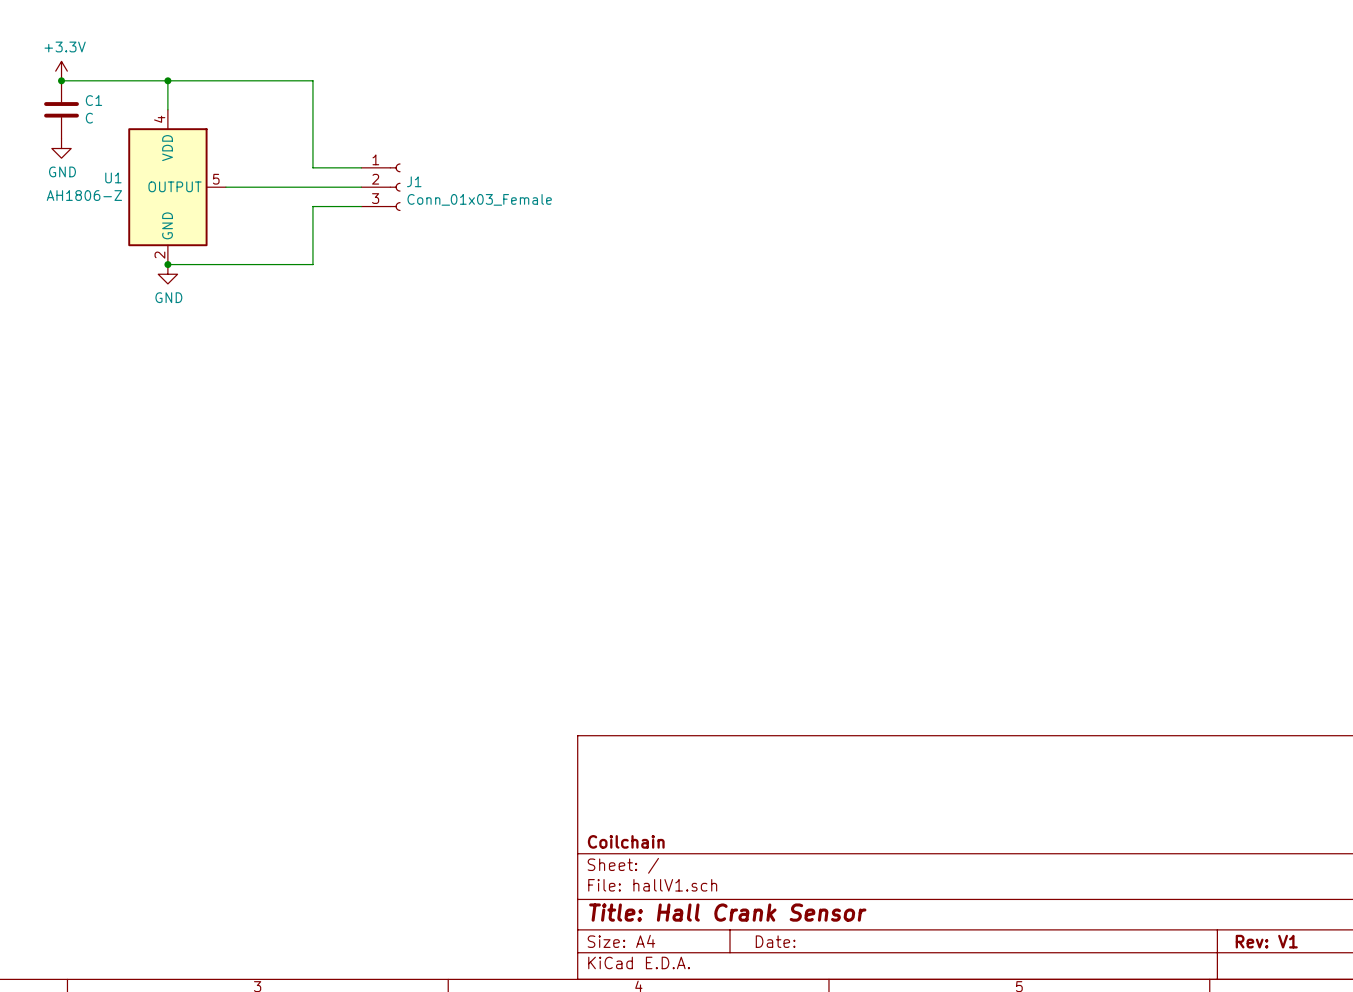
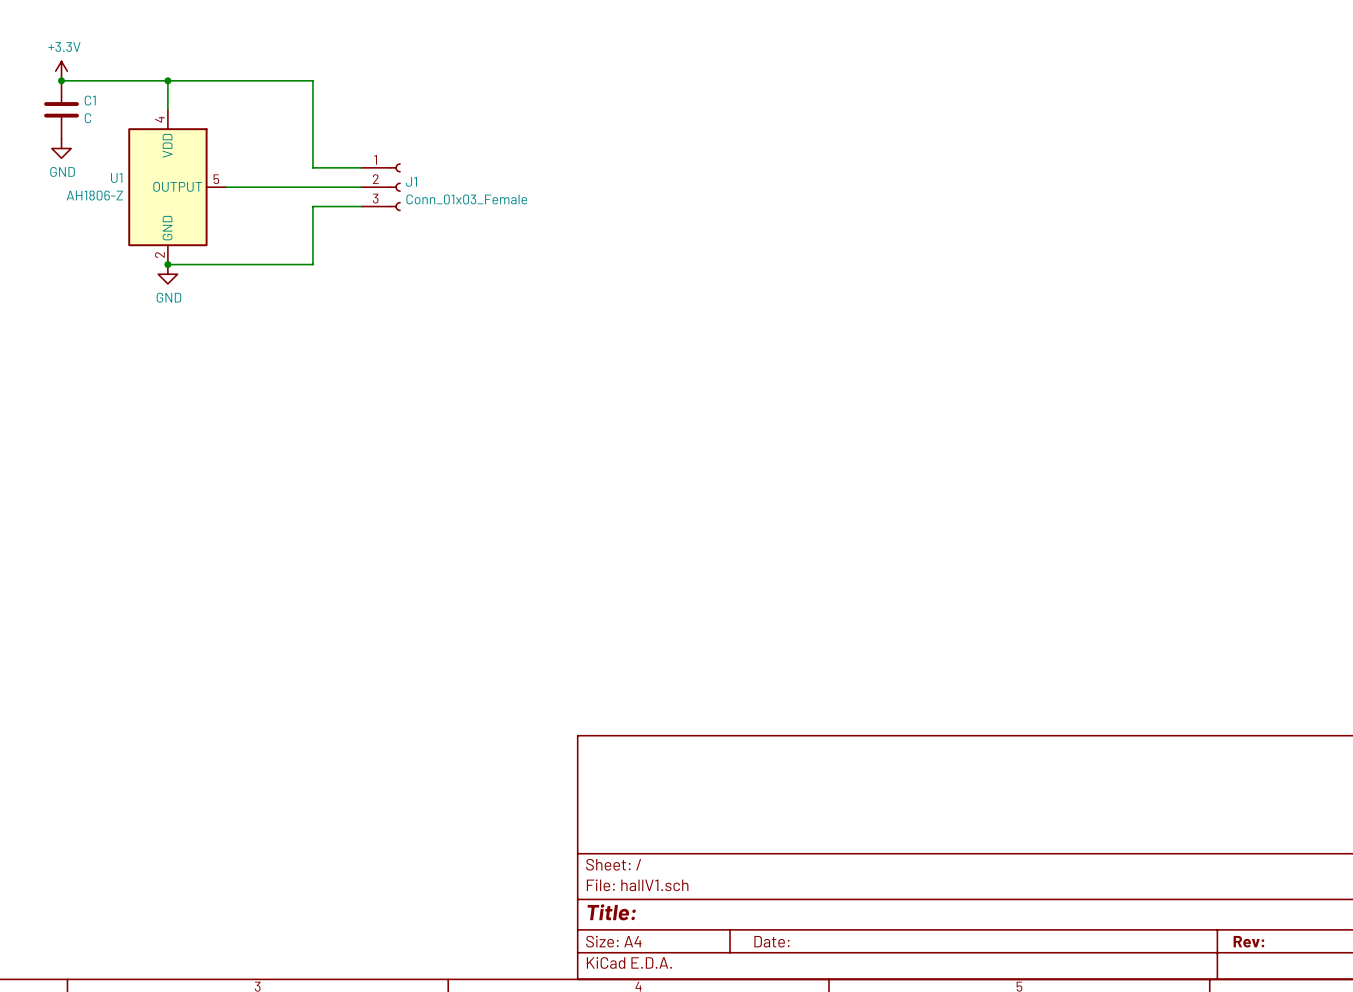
title block: Coilchain (626, 841) -> none
title block: Title: Hall Crank Sensor (727, 912) -> Title: (611, 912)
title block: Rev: V1 (1266, 941) -> Rev: (1248, 941)

